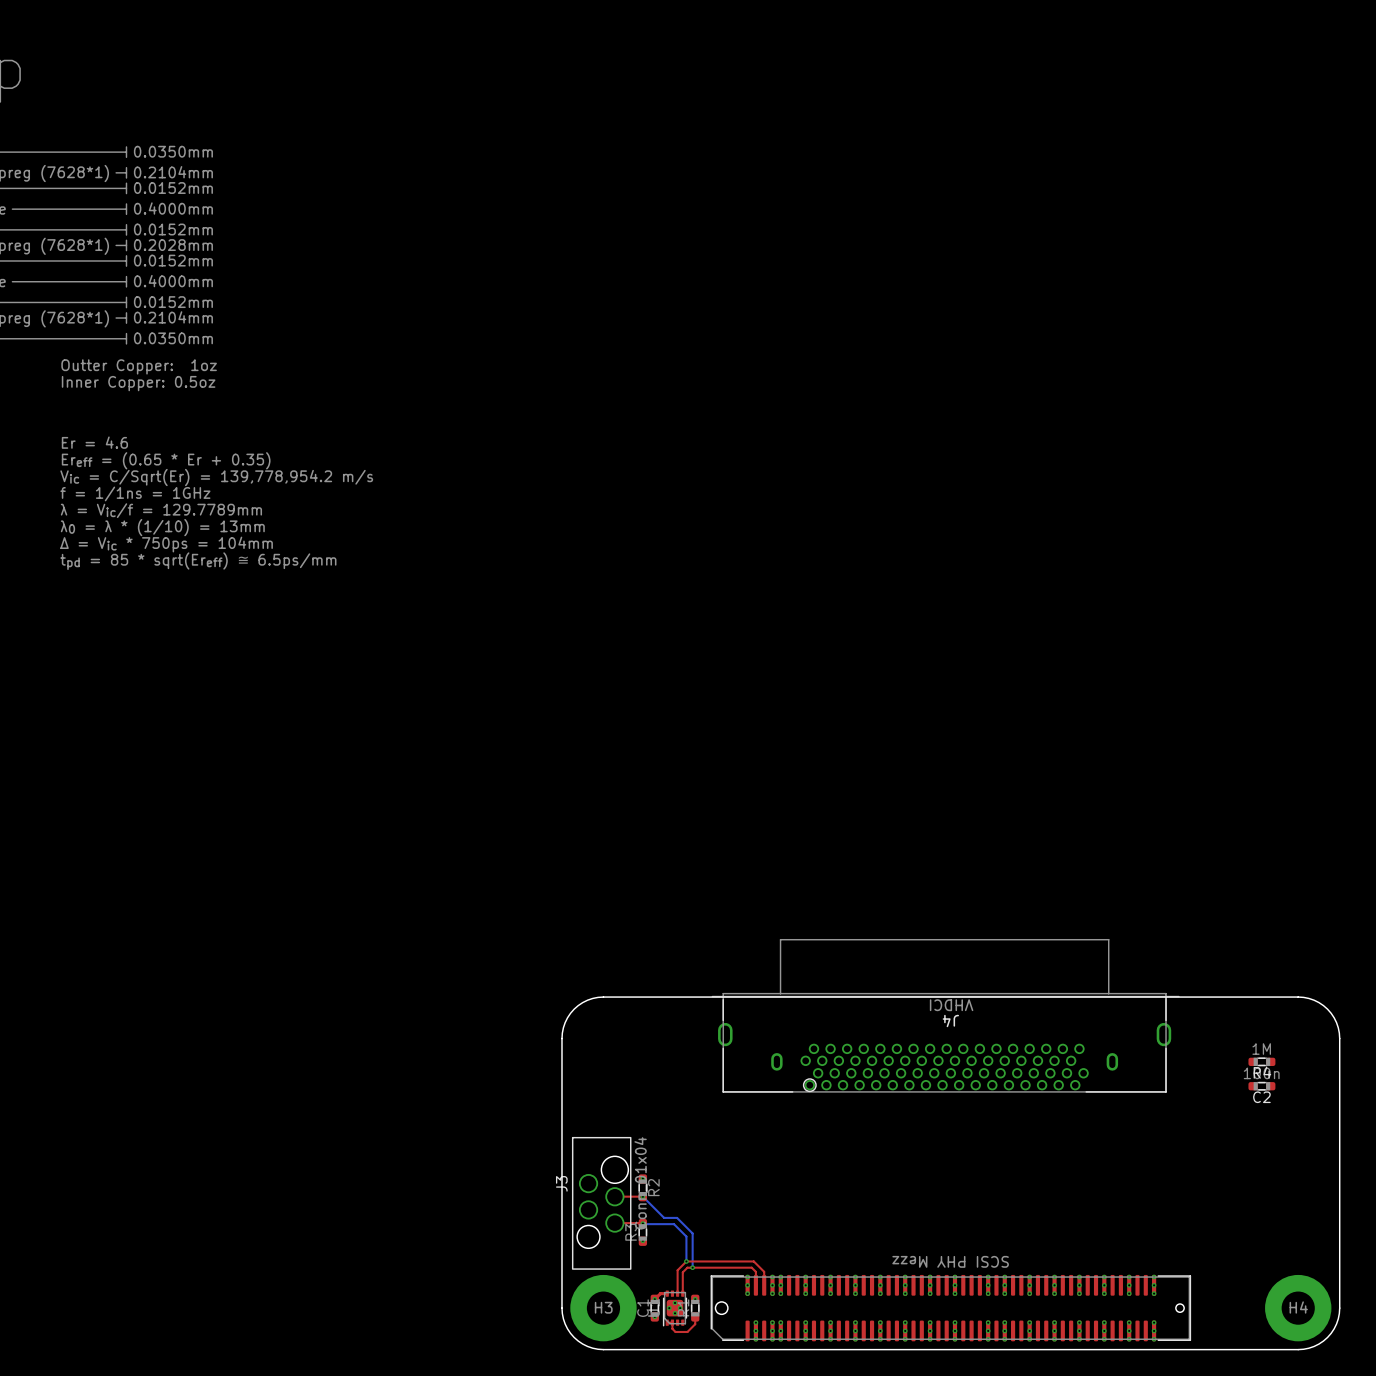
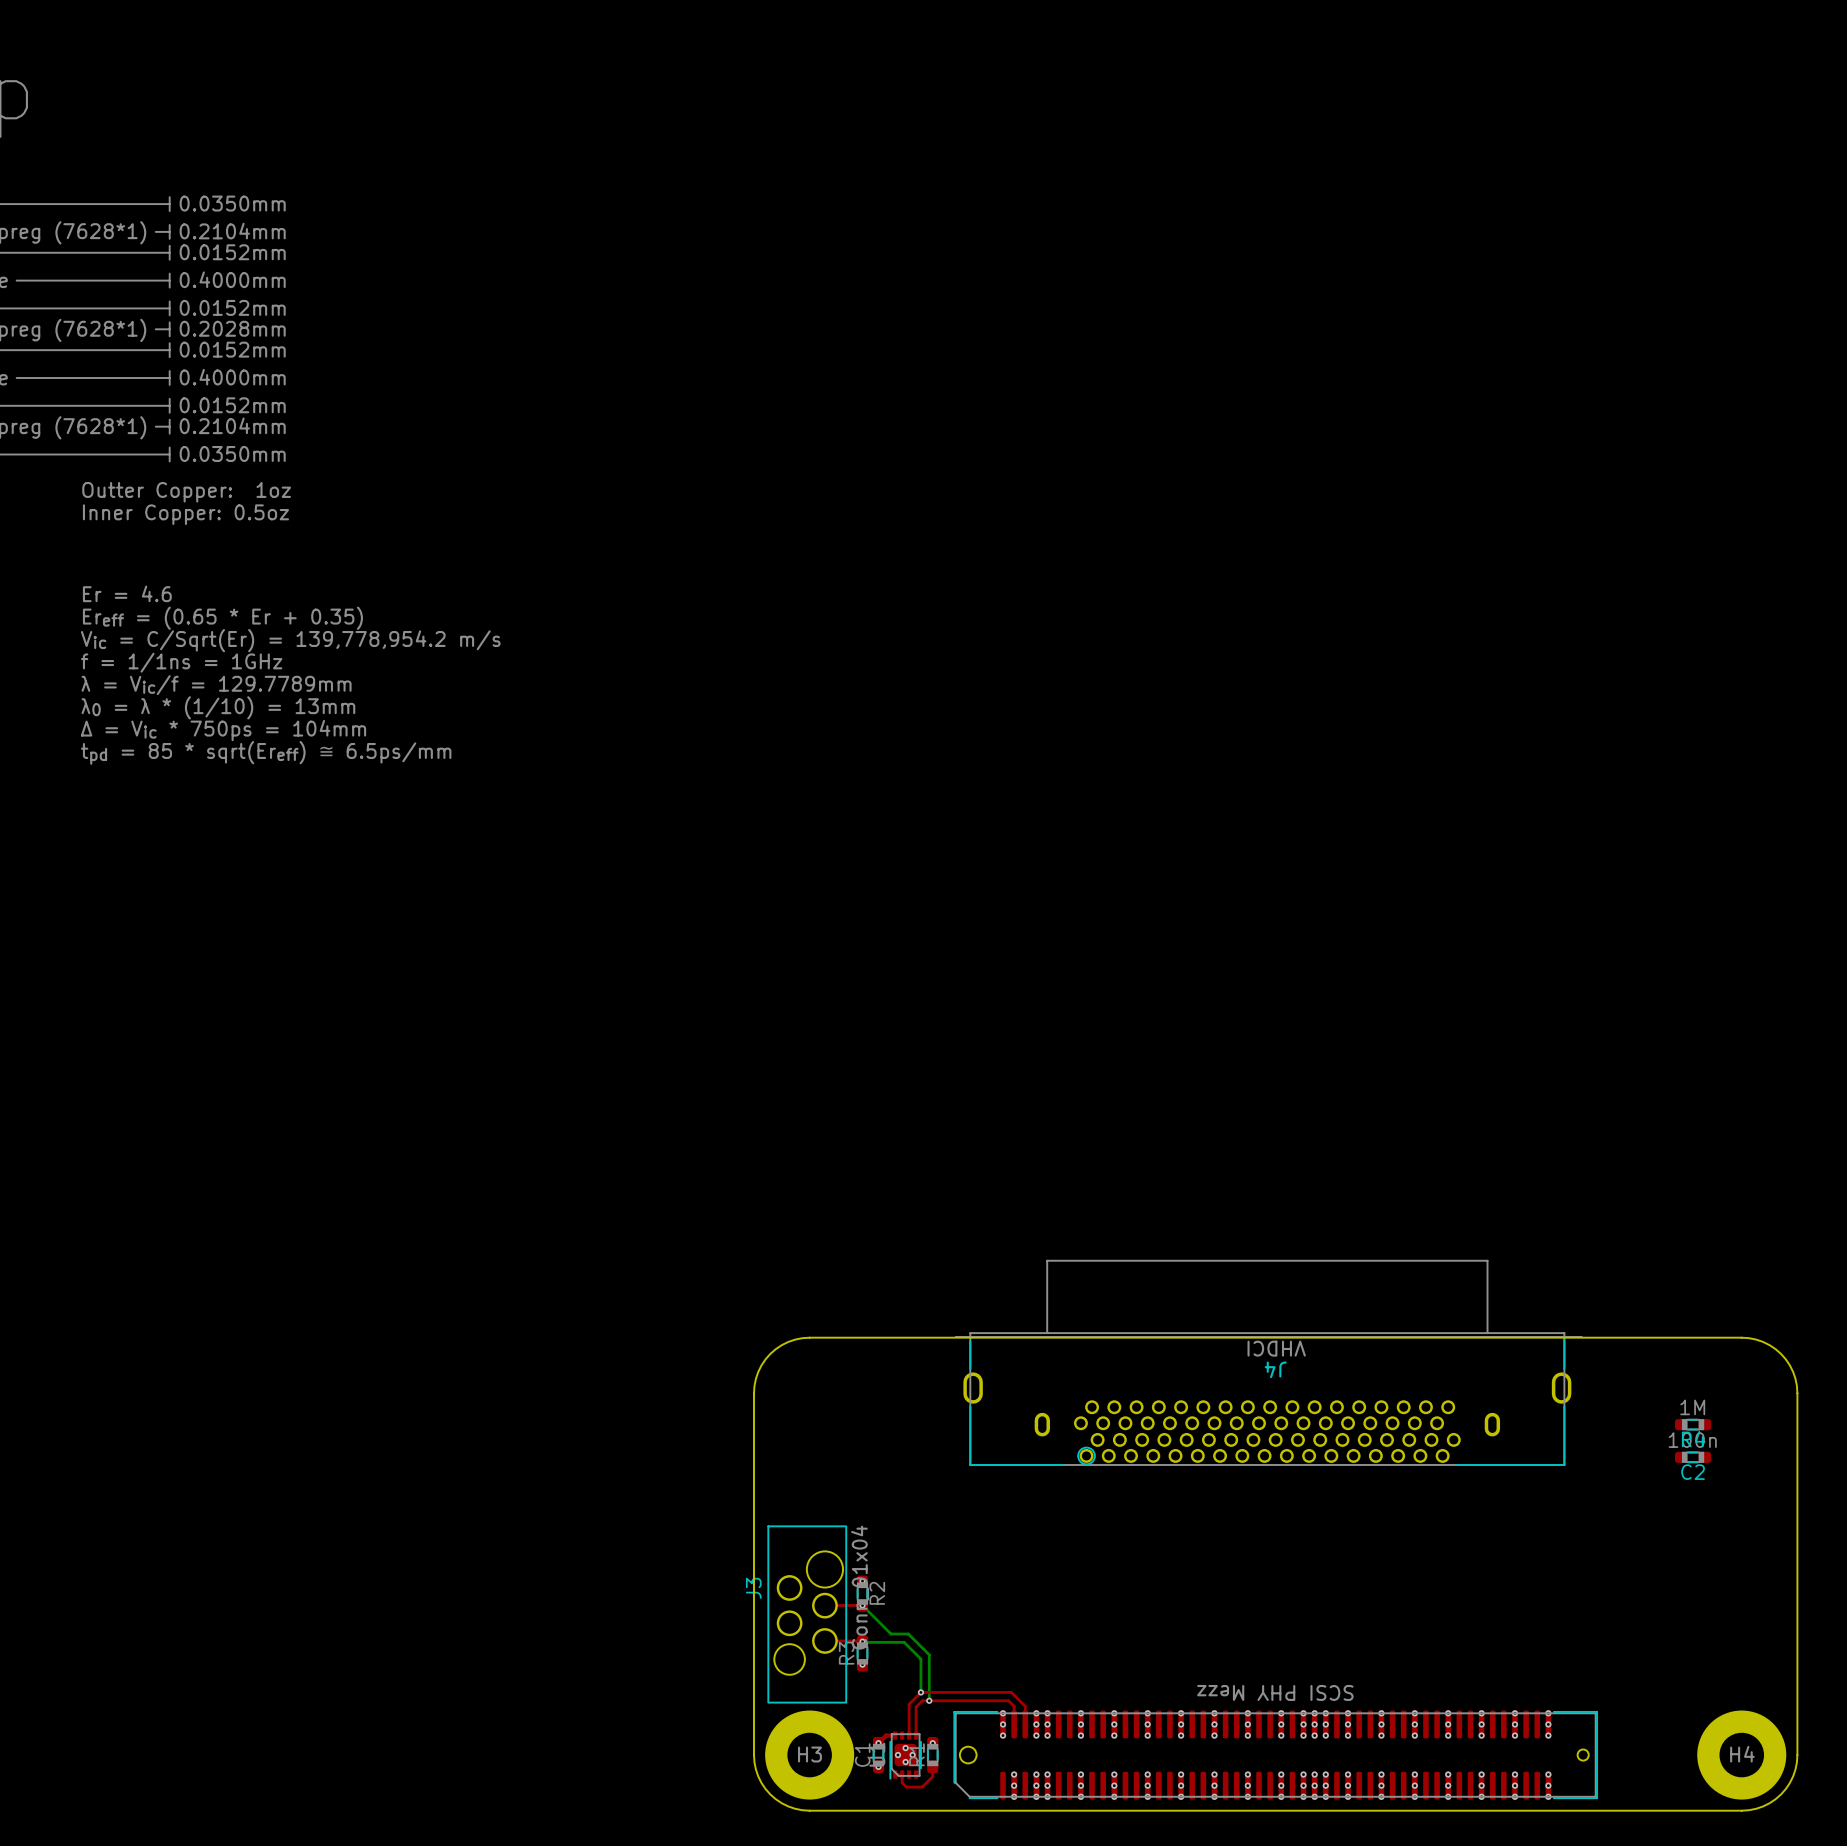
via: none -> (1303, 1713)
via: none -> (1314, 1713)
via: none -> (1303, 1724)
via: none -> (1314, 1724)
via: none -> (1303, 1735)
via: none -> (1314, 1735)
via: none -> (1303, 1774)
via: none -> (1314, 1774)
via: none -> (1303, 1785)
via: none -> (1314, 1785)
via: none -> (1303, 1796)
via: none -> (1314, 1796)

